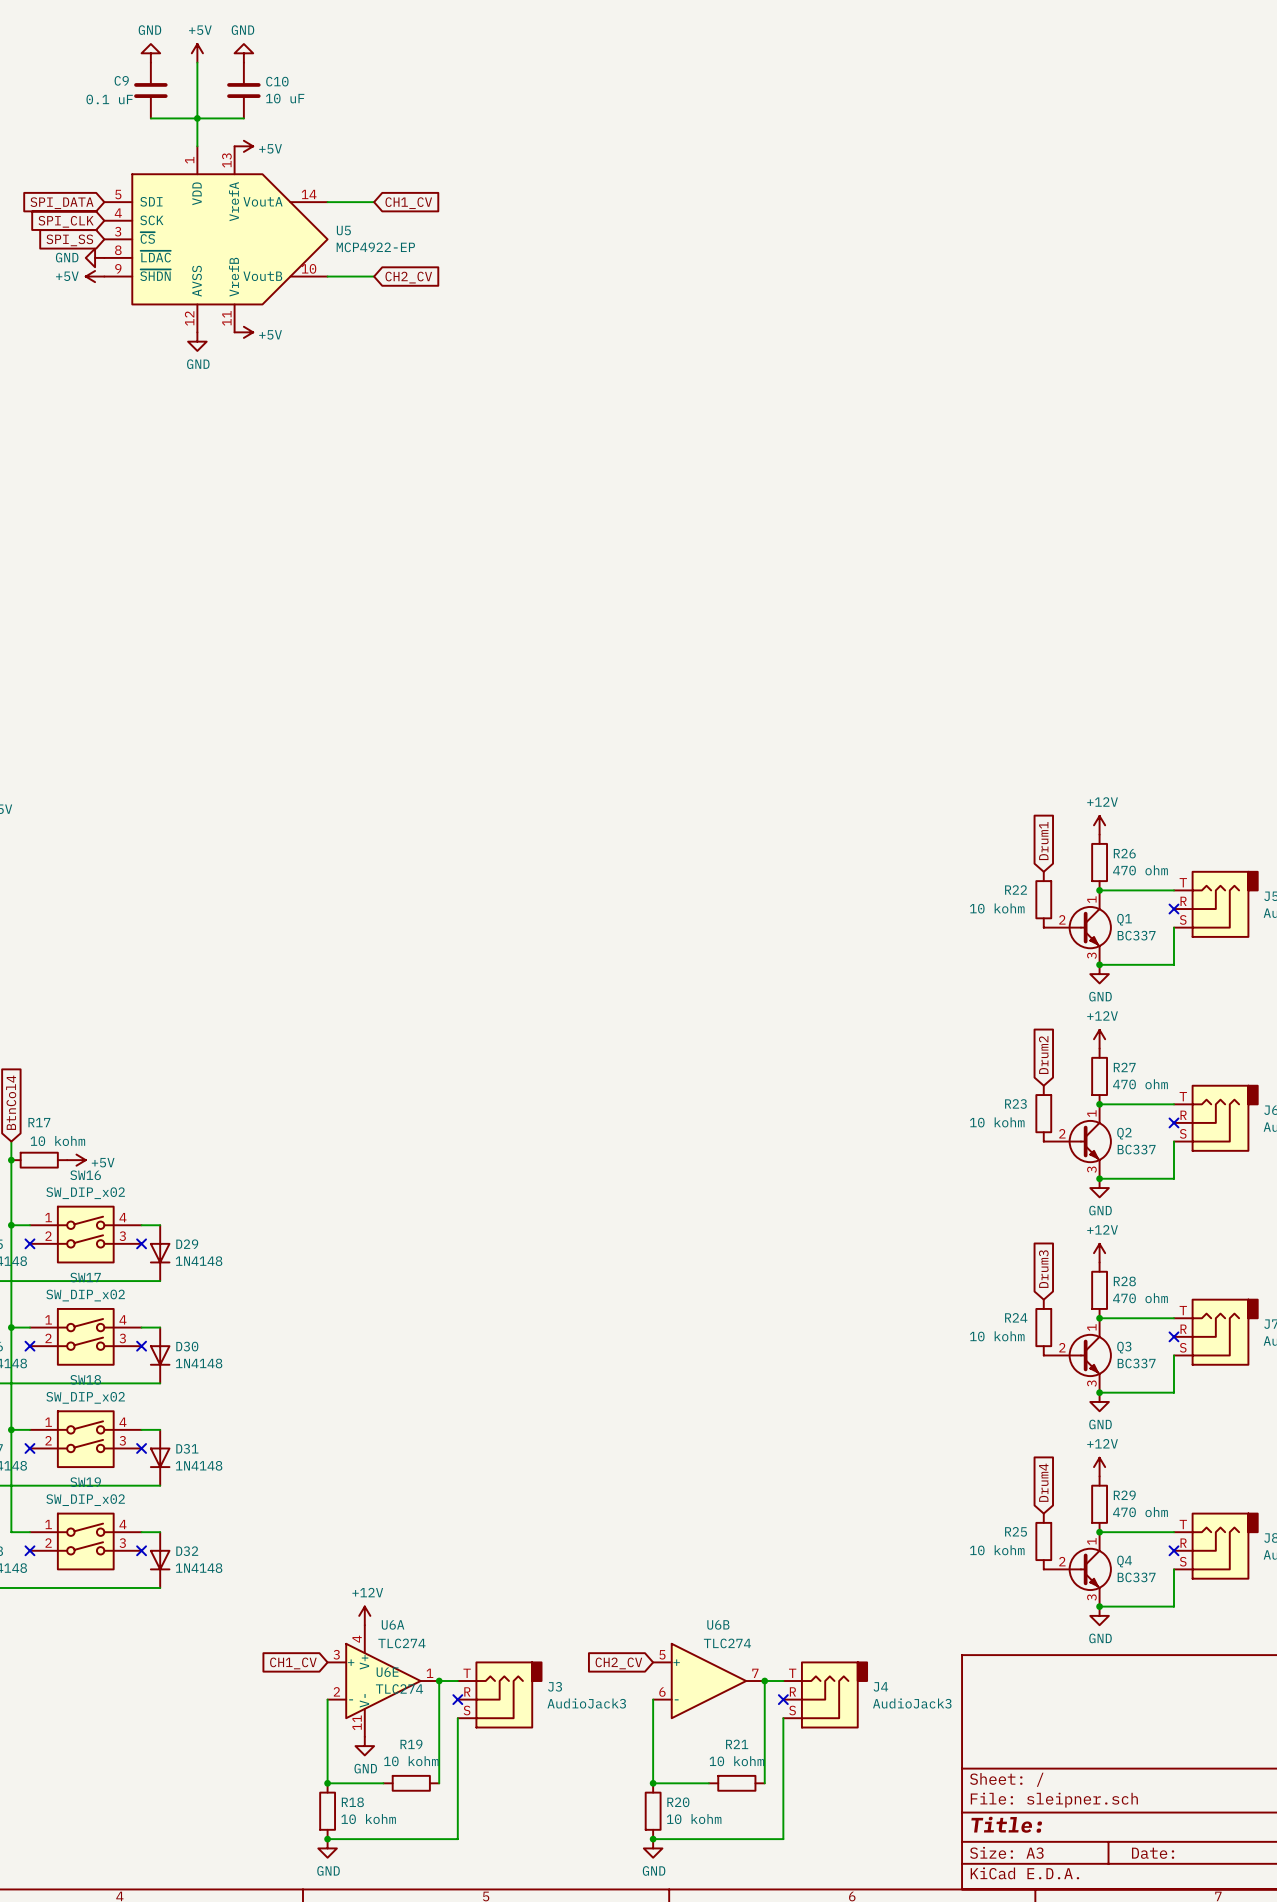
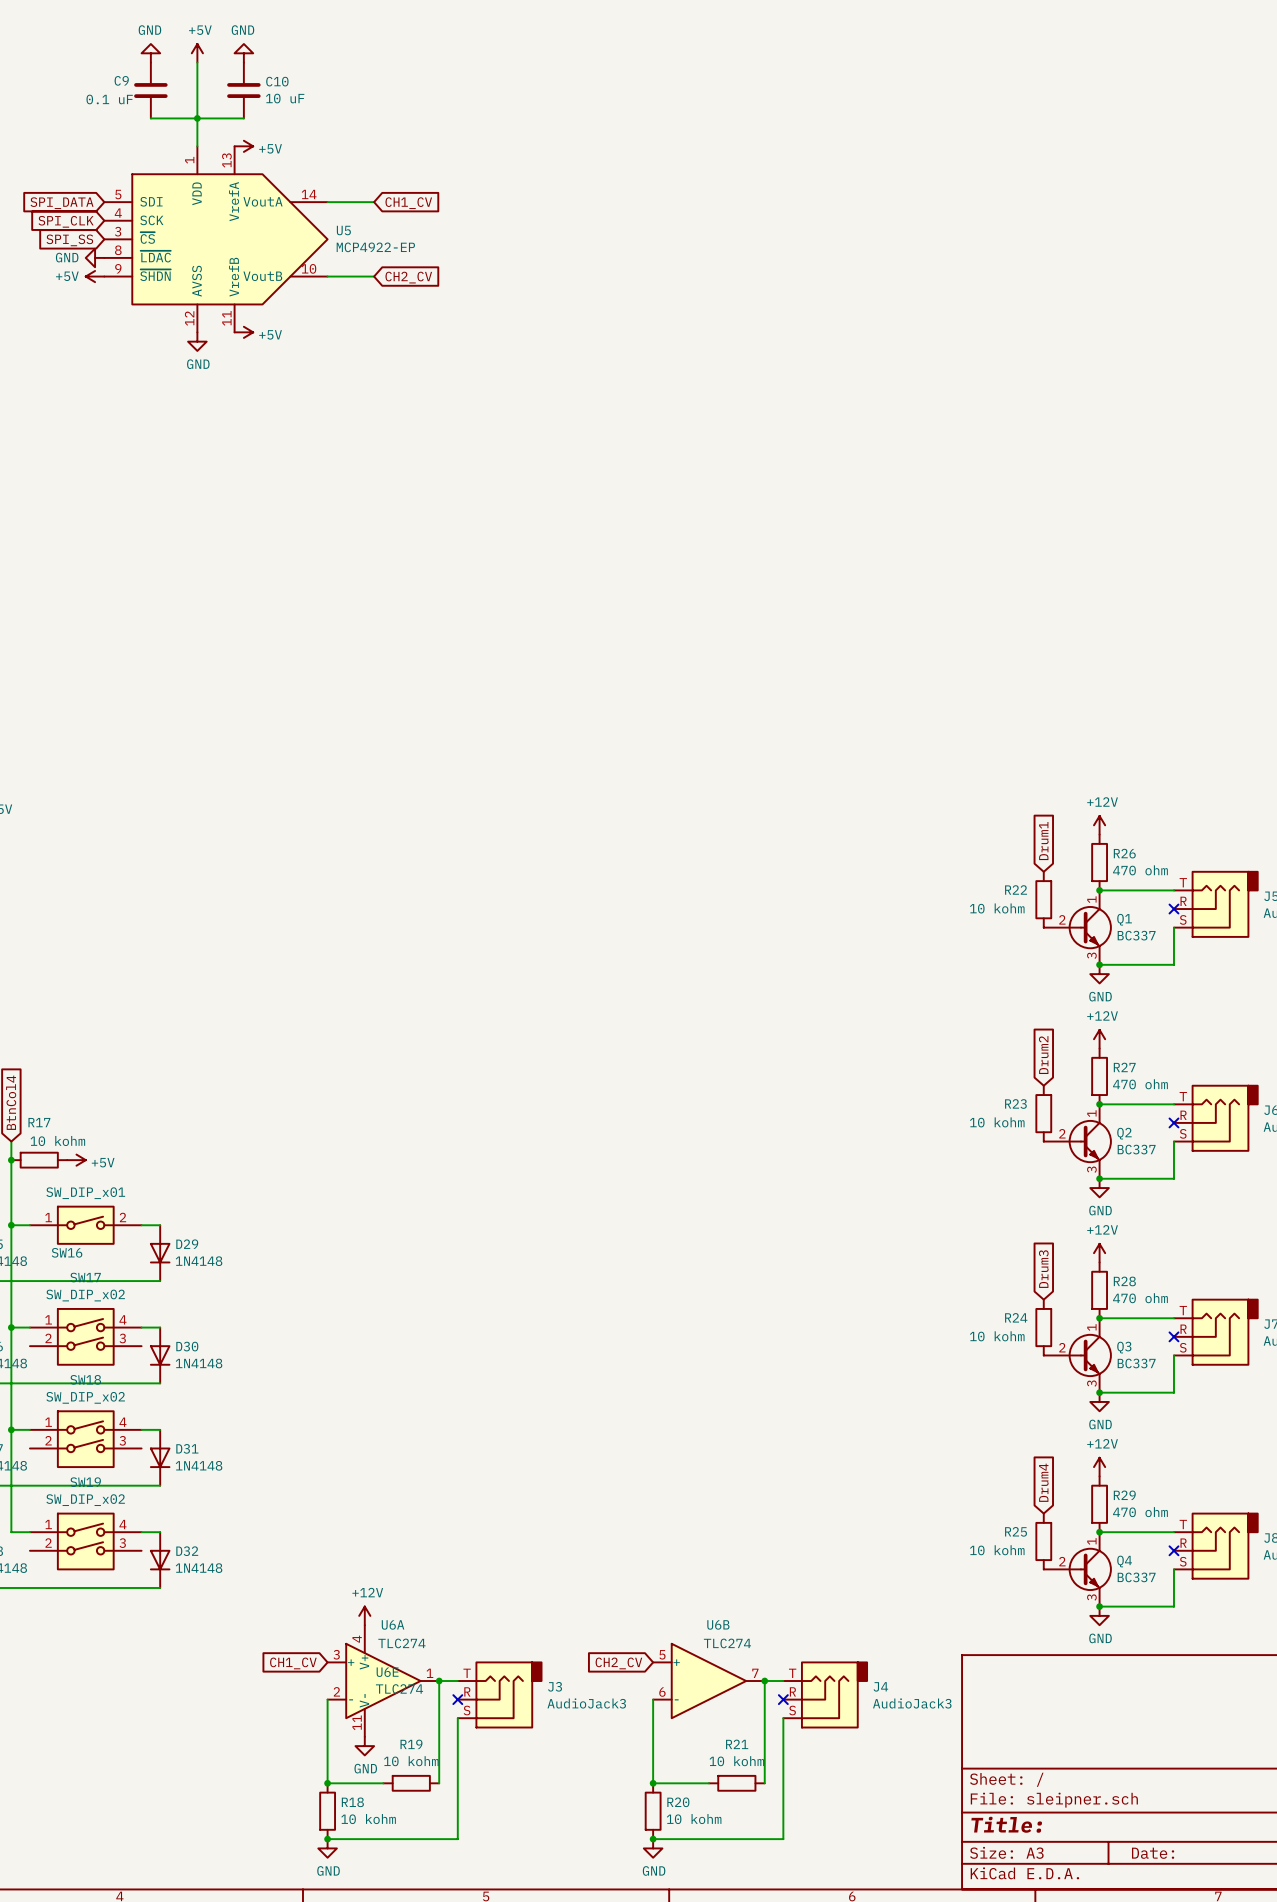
SW16 name position: SW16 (85, 1175) -> SW16 (67, 1252)
SW16 value: SW_DIP_x02 (85, 1193) -> SW_DIP_x01 (85, 1193)
SW16 symbol: [29, 1205, 142, 1264] -> [29, 1205, 142, 1245]
no-connect mark: (29, 1243) -> none
no-connect mark: (141, 1243) -> none
no-connect mark: (29, 1346) -> none
no-connect mark: (141, 1346) -> none
no-connect mark: (29, 1448) -> none
no-connect mark: (141, 1448) -> none
no-connect mark: (29, 1550) -> none
no-connect mark: (141, 1550) -> none

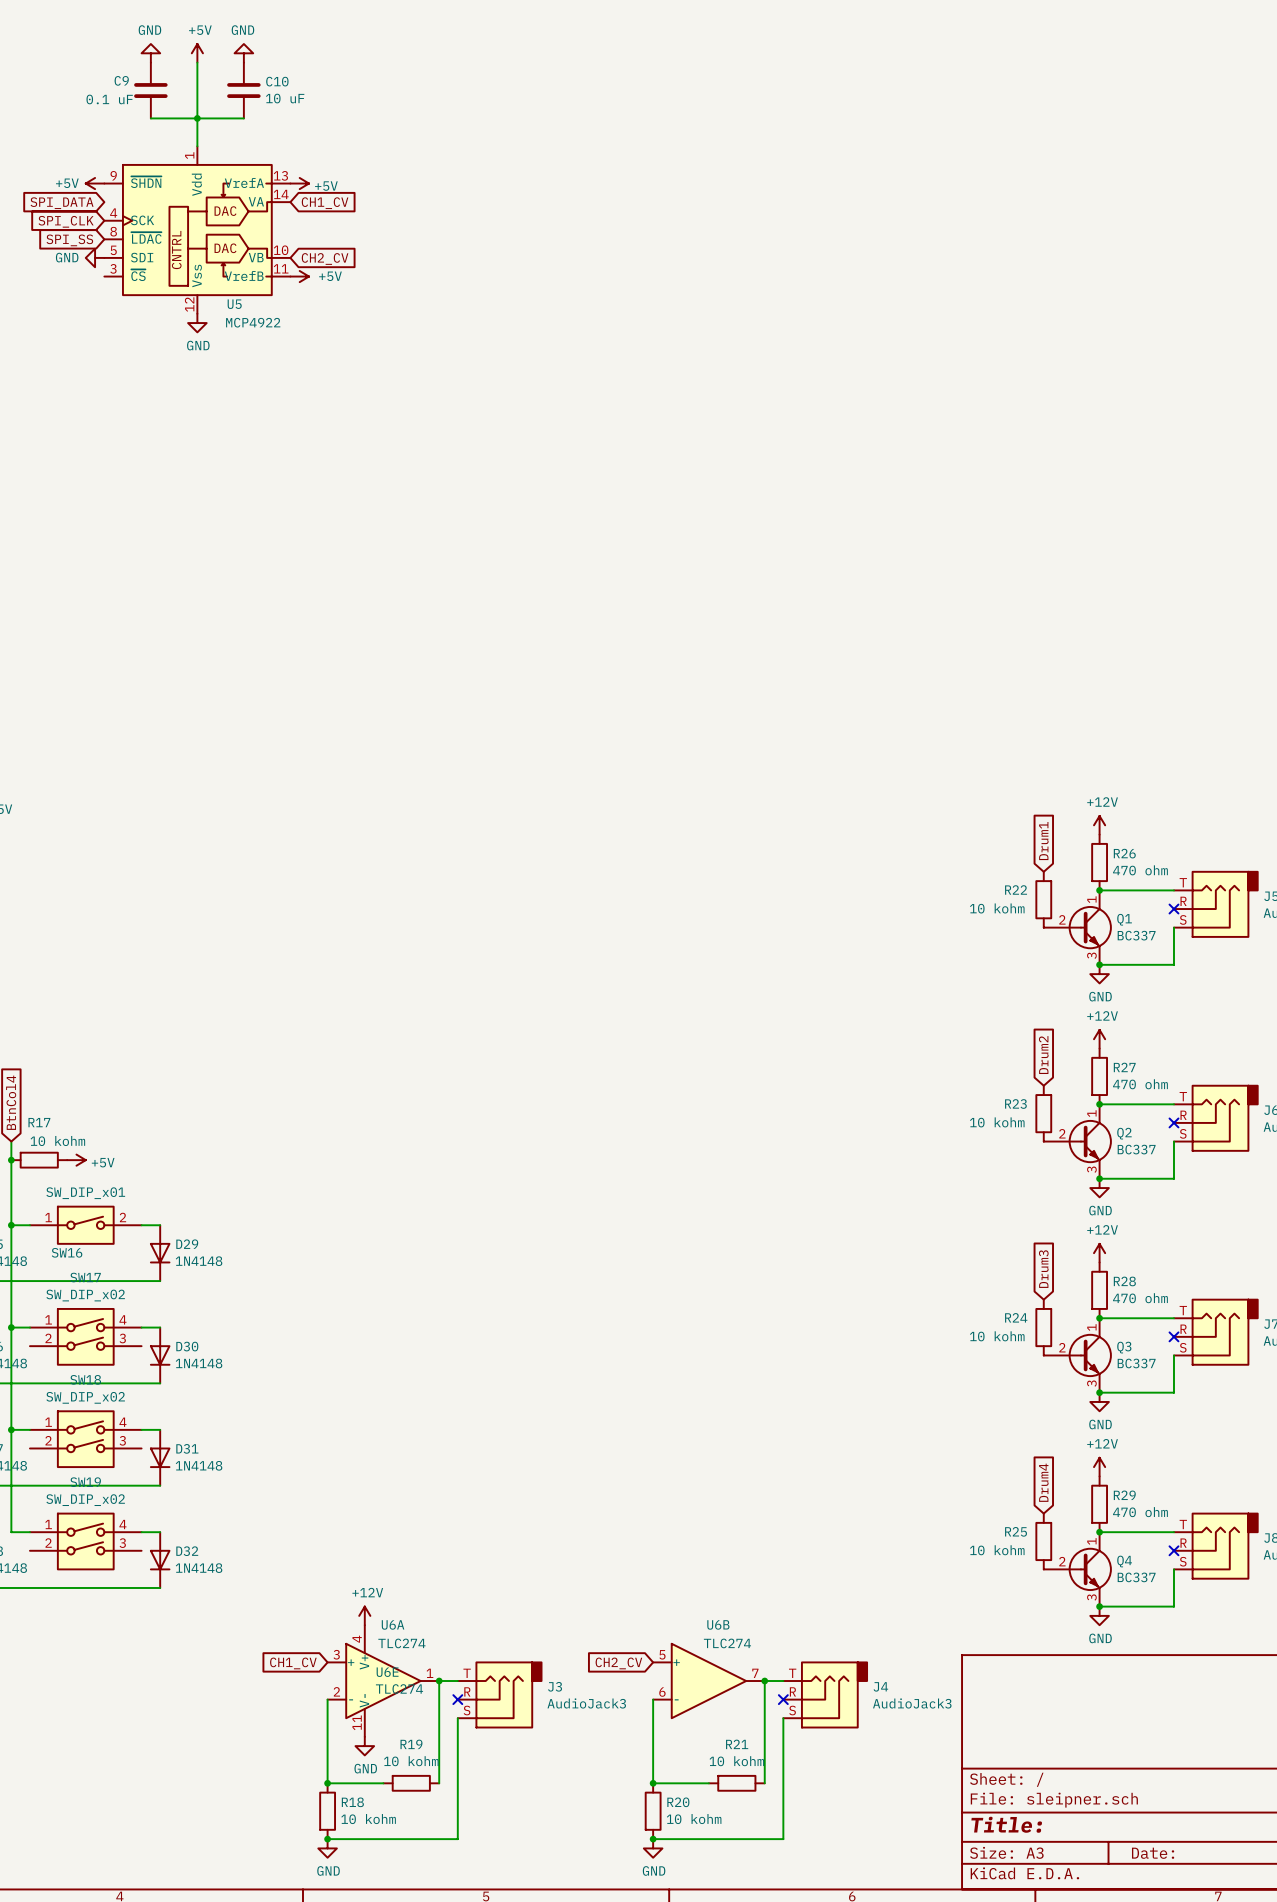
U5 symbol: [104, 146, 329, 333] -> [104, 146, 291, 314]
power symbol position: +5V (243, 146) -> +5V (299, 183)
power symbol: none -> +5V (95, 183)
wire: (327, 202) (374, 202) -> none
global label position: CH1_CV (408, 203) -> CH1_CV (325, 203)
U5 name position: U5 (343, 230) -> U5 (234, 304)
U5 value: MCP4922-EP (375, 247) -> MCP4922 (253, 322)
power symbol: +5V (95, 276) -> none
power symbol: none -> +5V (299, 276)
wire: (327, 276) (374, 276) -> none
global label position: CH2_CV (408, 277) -> CH2_CV (325, 258)
power symbol: +5V (243, 332) -> none
power symbol position: GND (197, 341) -> GND (197, 323)

